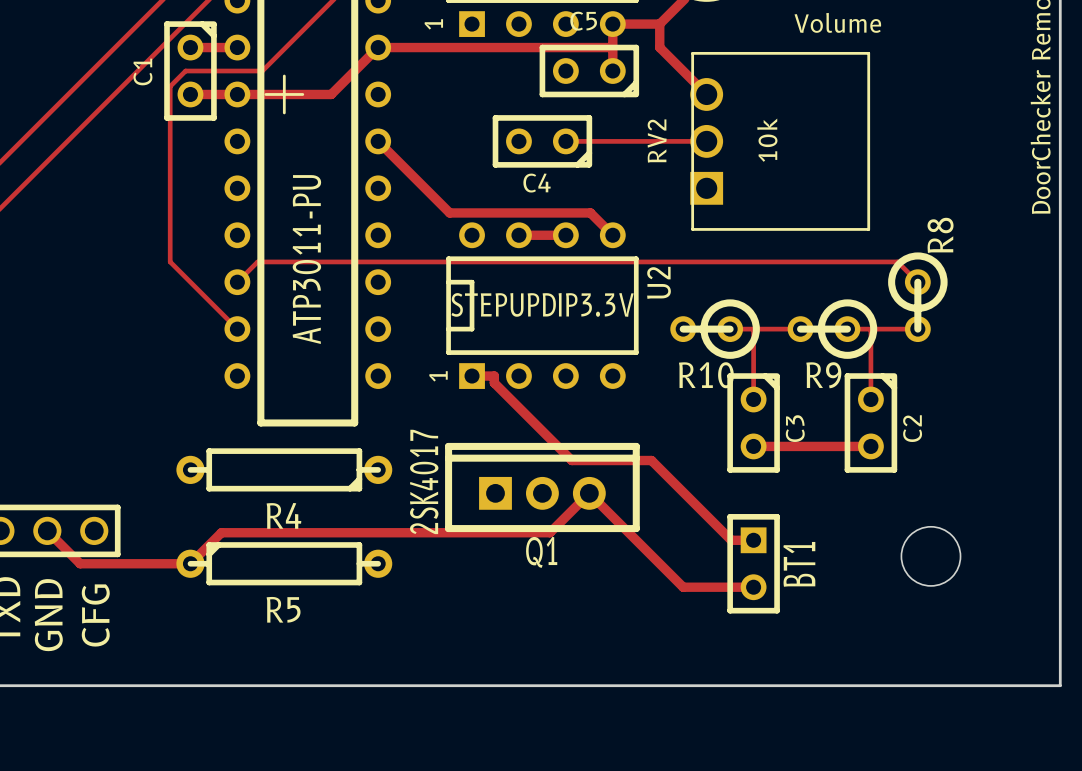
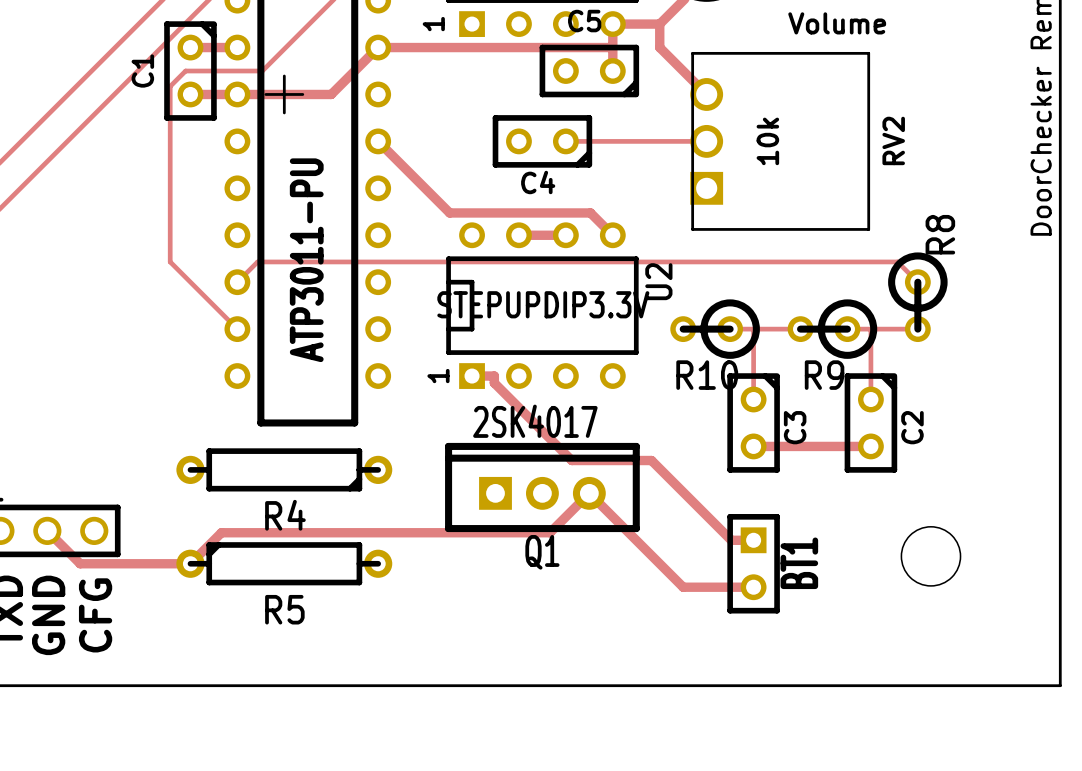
RV2 name position: RV2 (657, 141) -> RV2 (893, 140)
Q1 value rotation: 0° (424, 481) -> 90° clockwise (535, 421)

